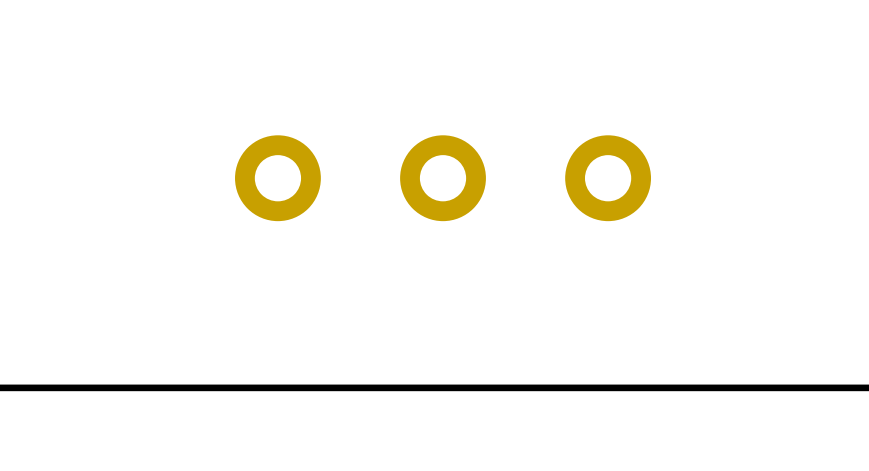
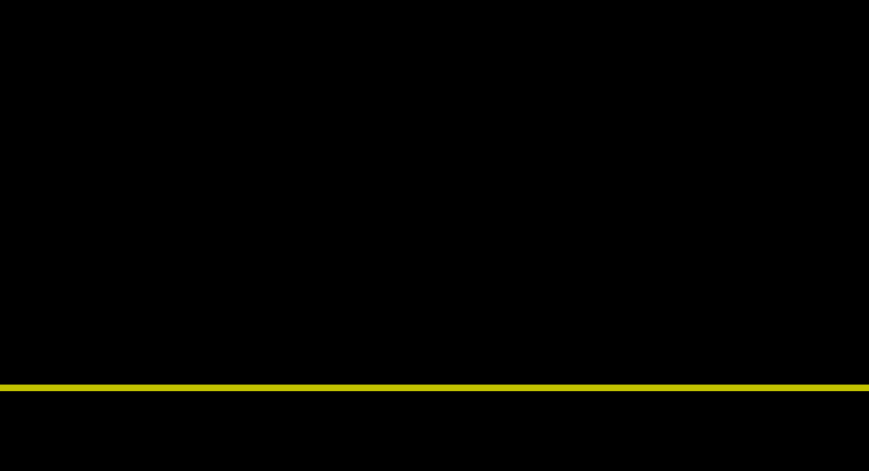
part: (443, 178) -> none

